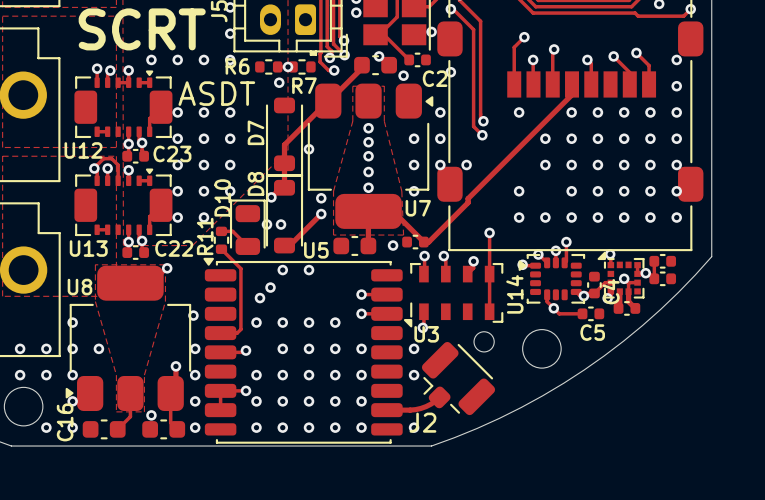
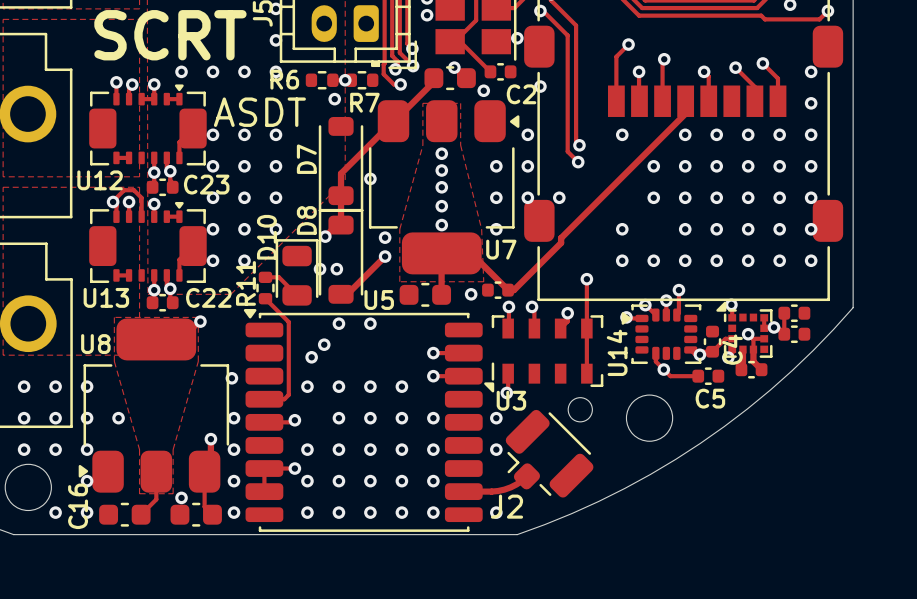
via: none -> (24, 386)
via: none -> (55, 386)

